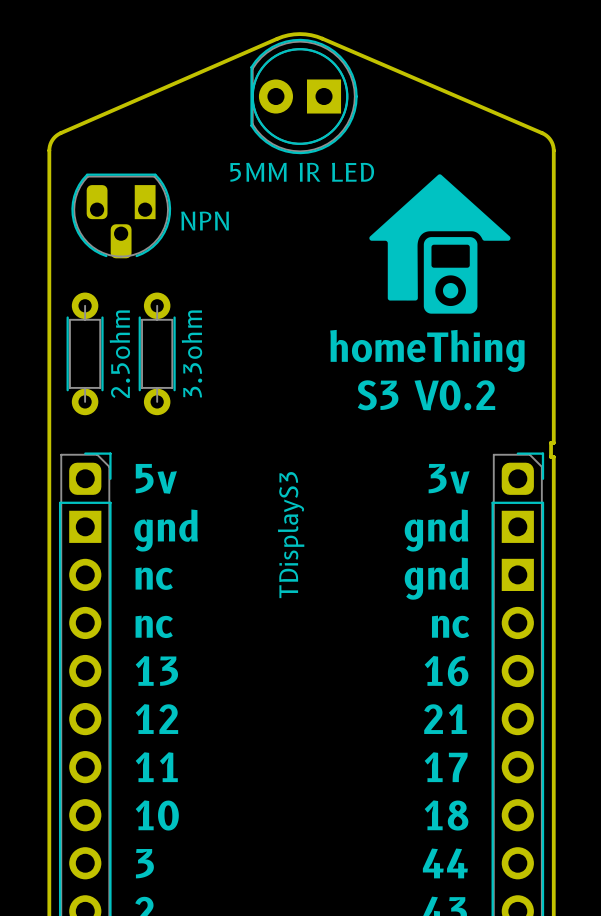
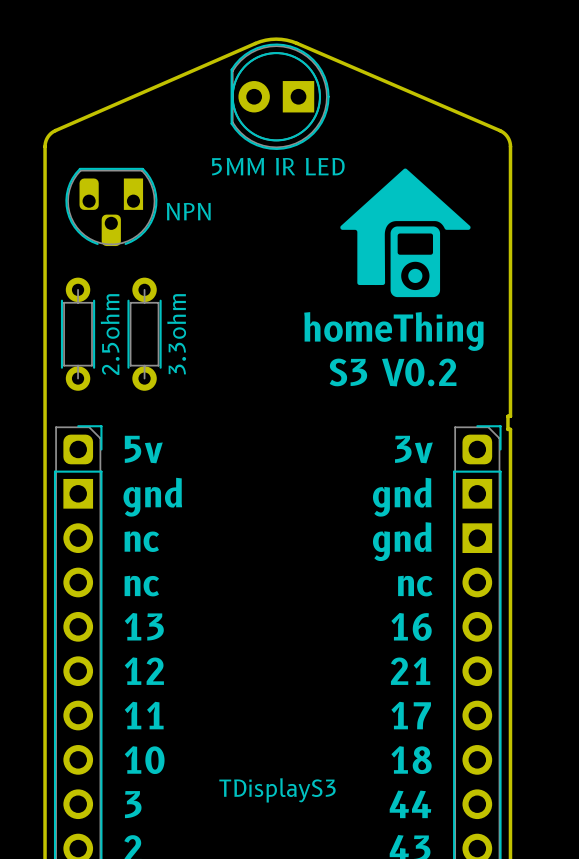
TDisplayS3 name rotation: 0° (291, 535) -> 90° clockwise (277, 790)
TDisplayS3 name position: TDisplayS3 (291, 535) -> TDisplayS3 (277, 790)

